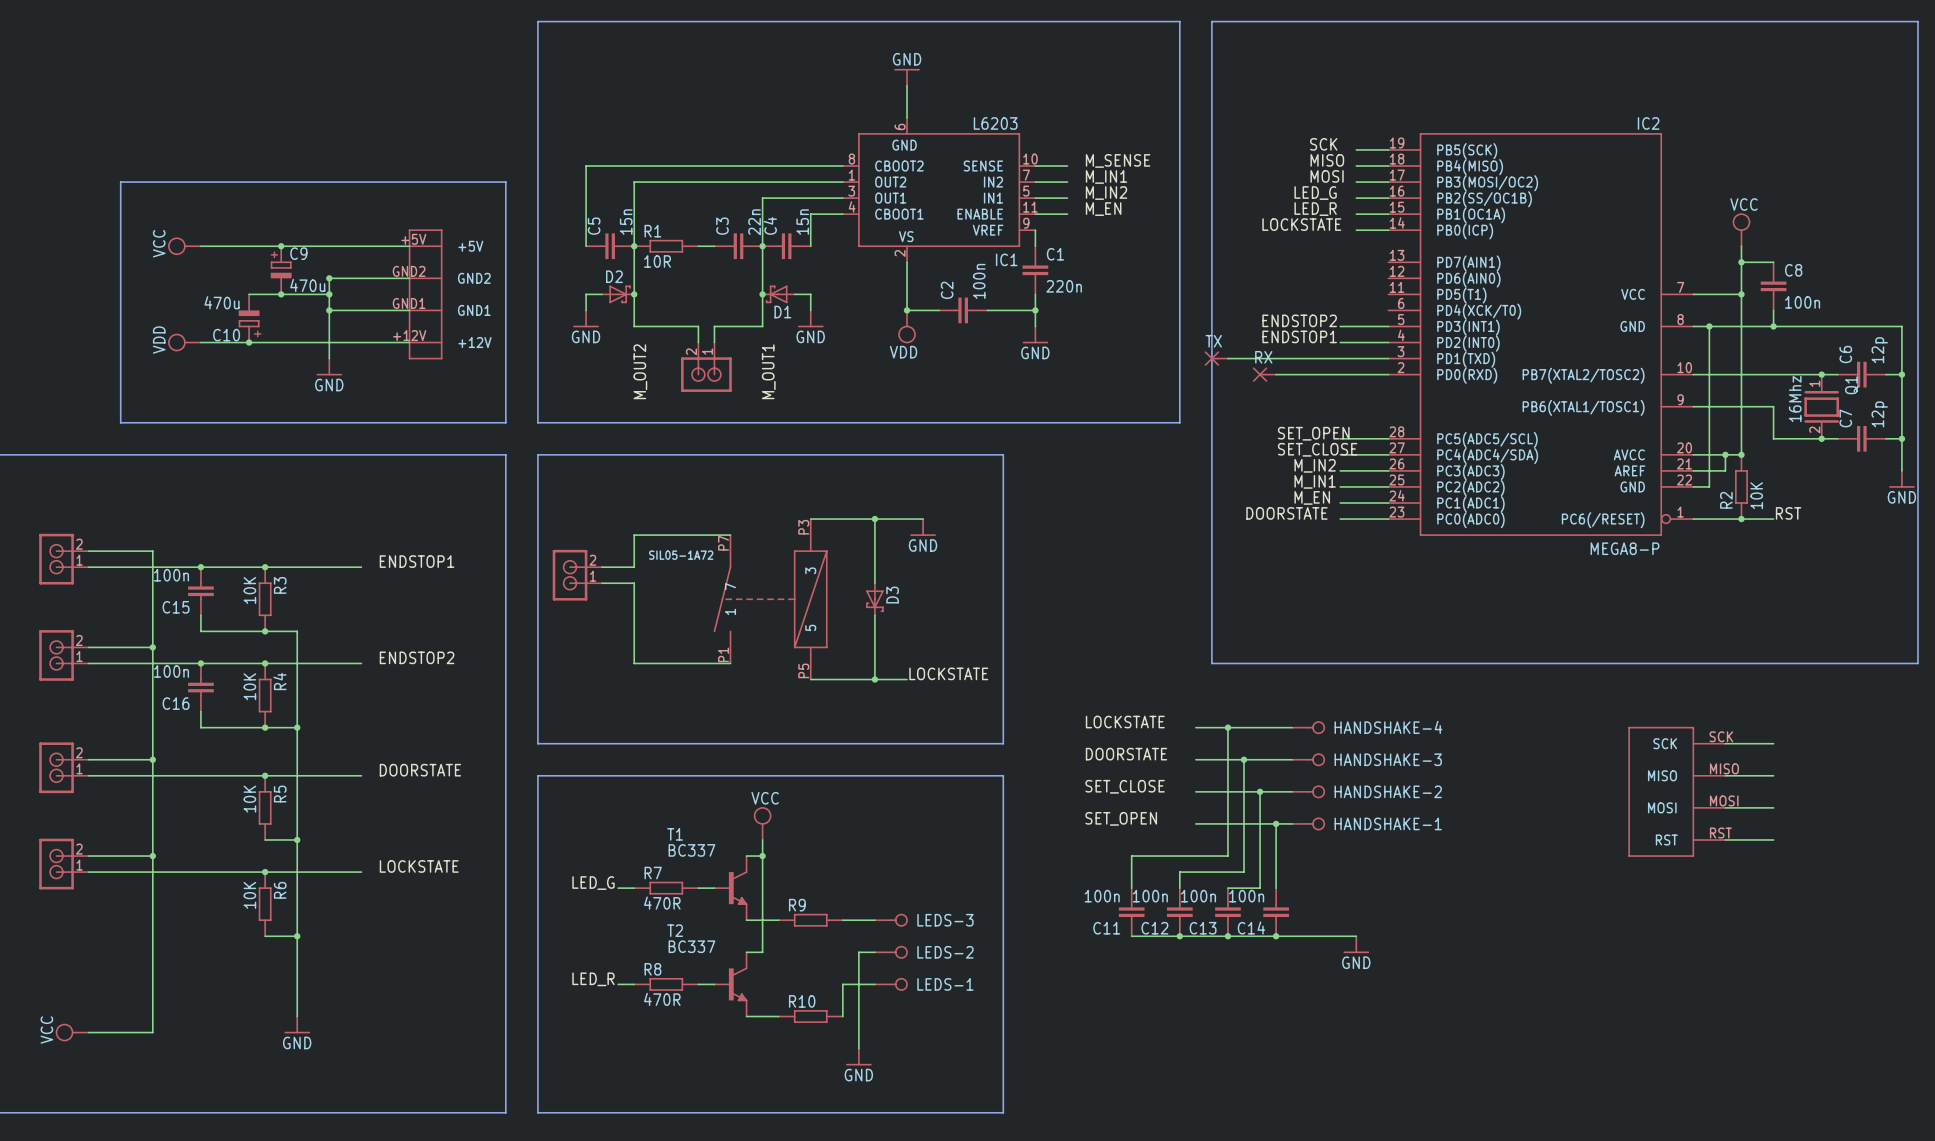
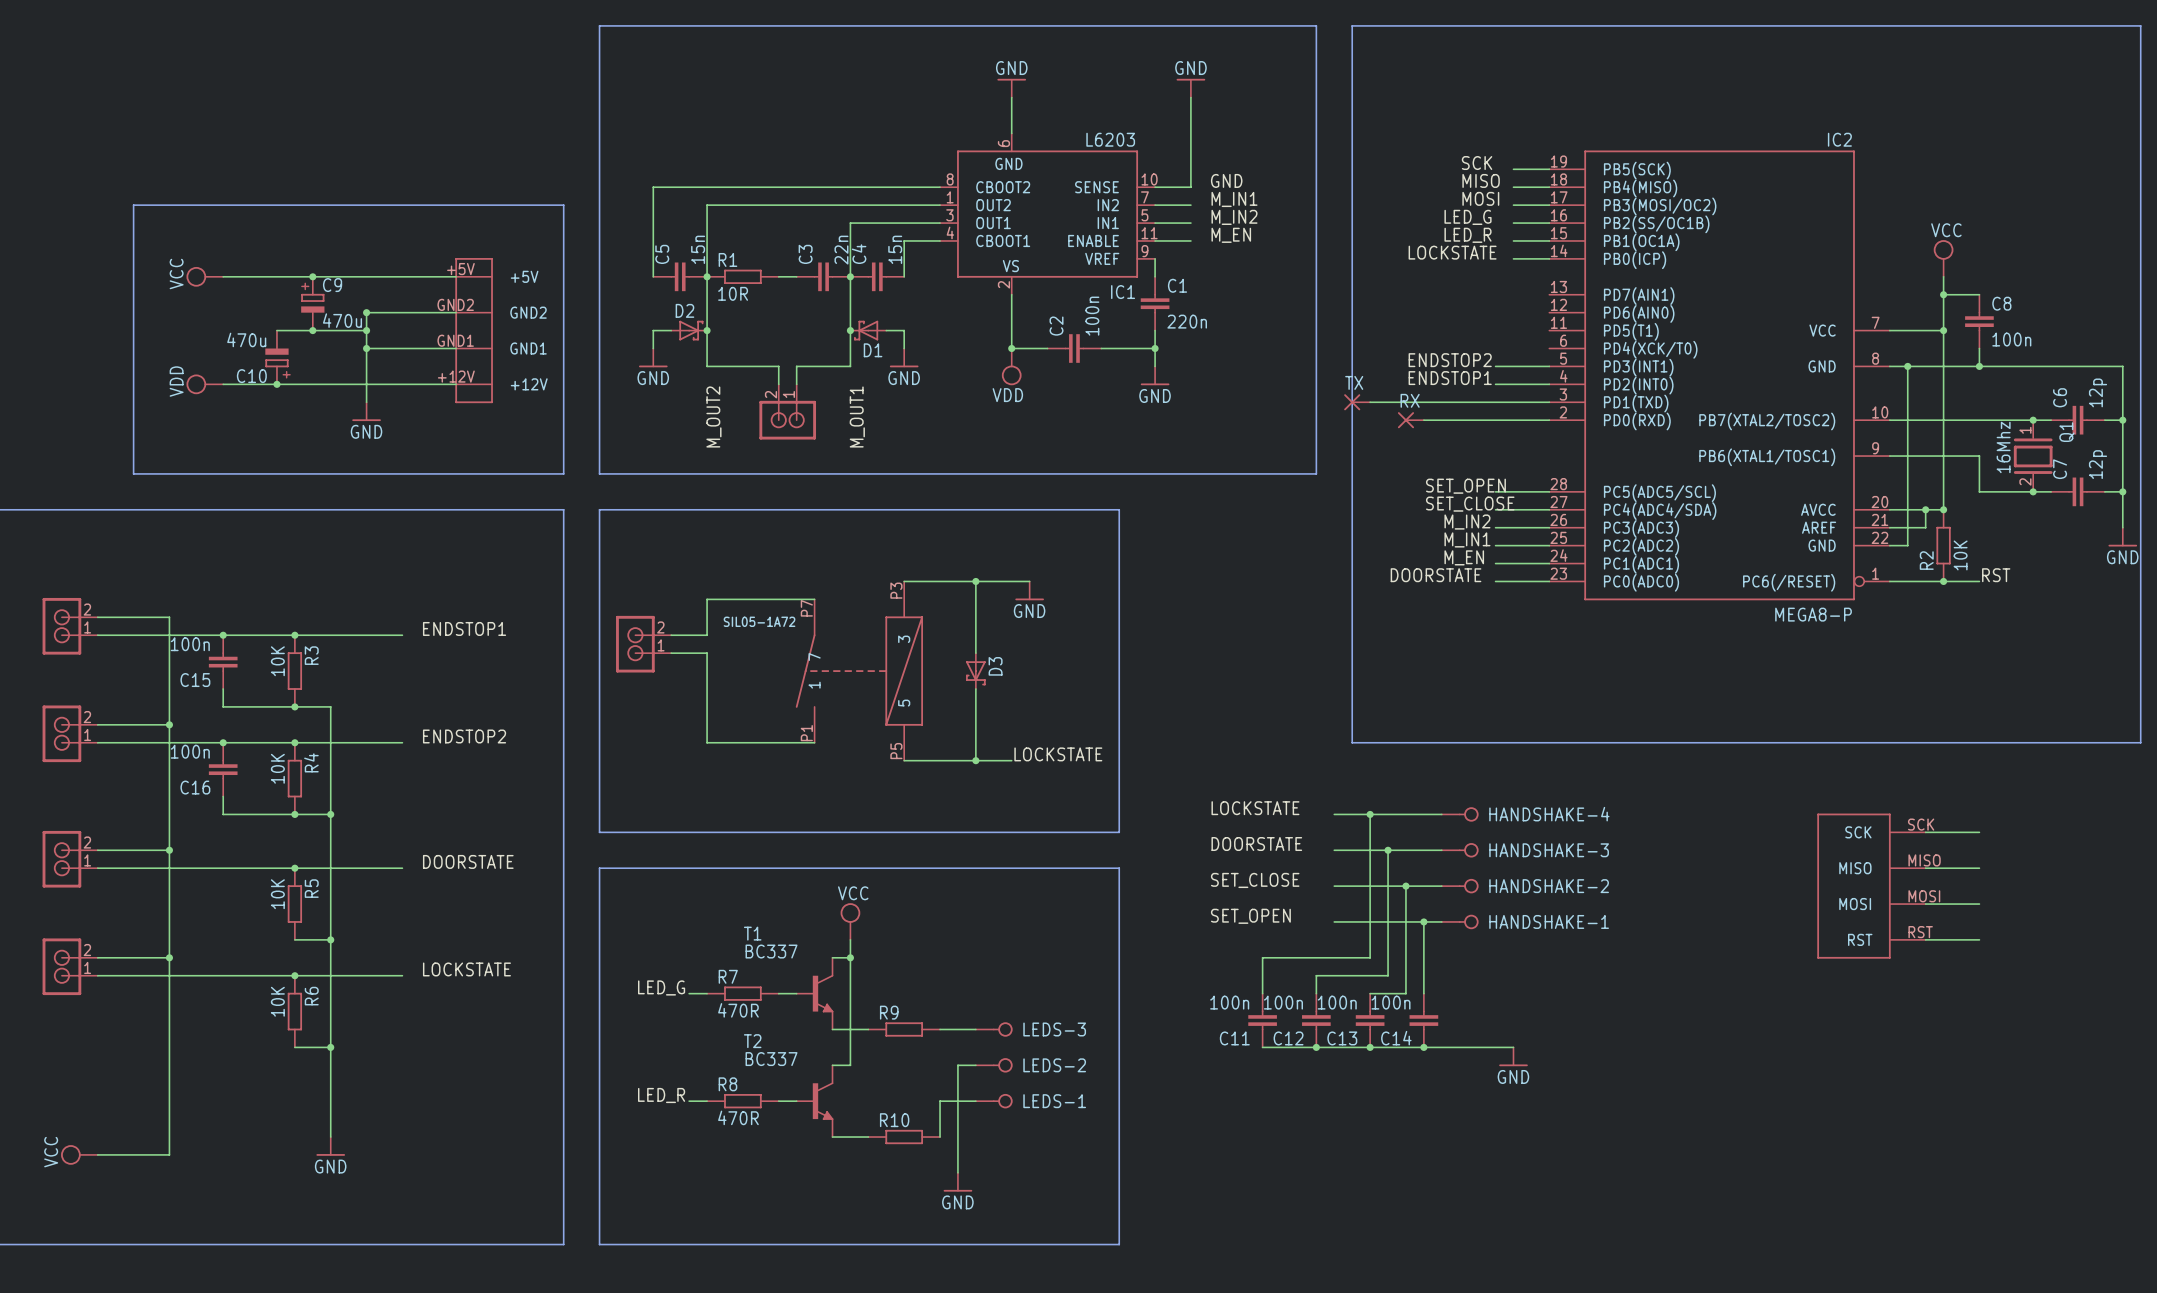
power symbol: none -> GND (1190, 88)
wire: none -> (1190, 97) (1190, 187)
label: M_SENSE (1118, 160) -> GND (1226, 180)

